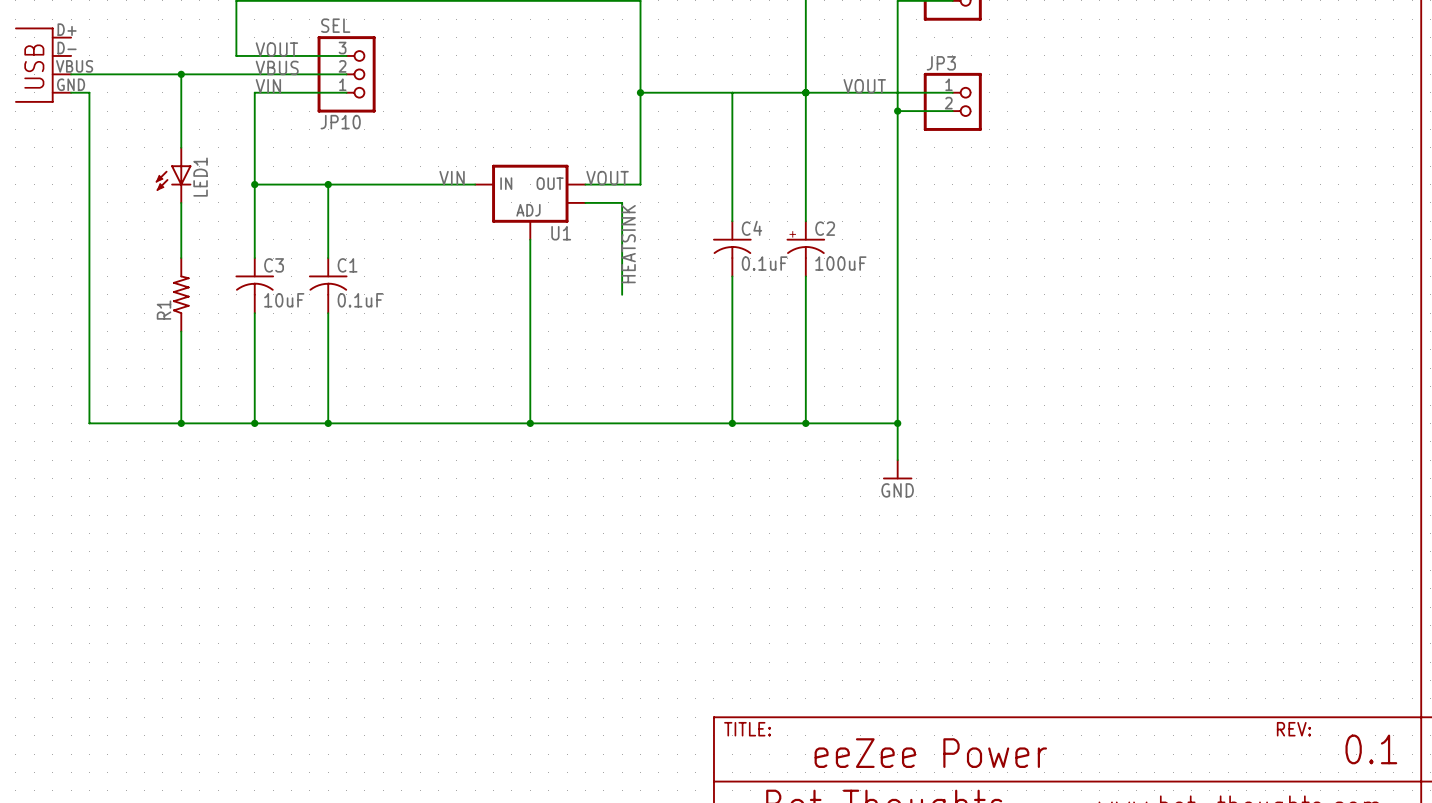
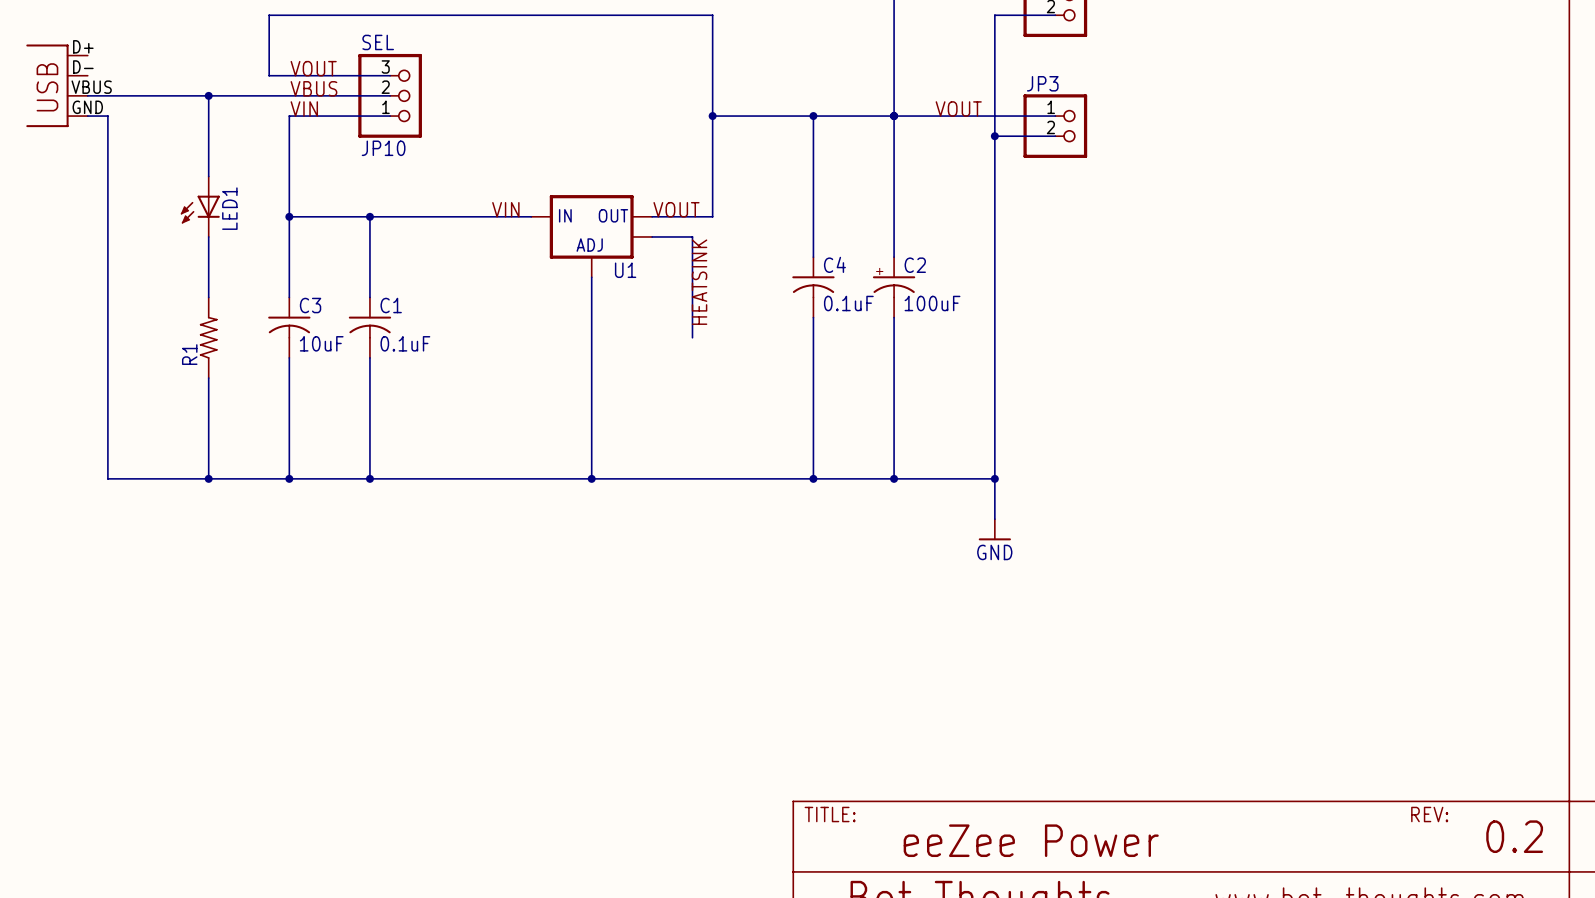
junction: none -> (813, 116)
text: 0.1 (1371, 749) -> 0.2 (1514, 836)

